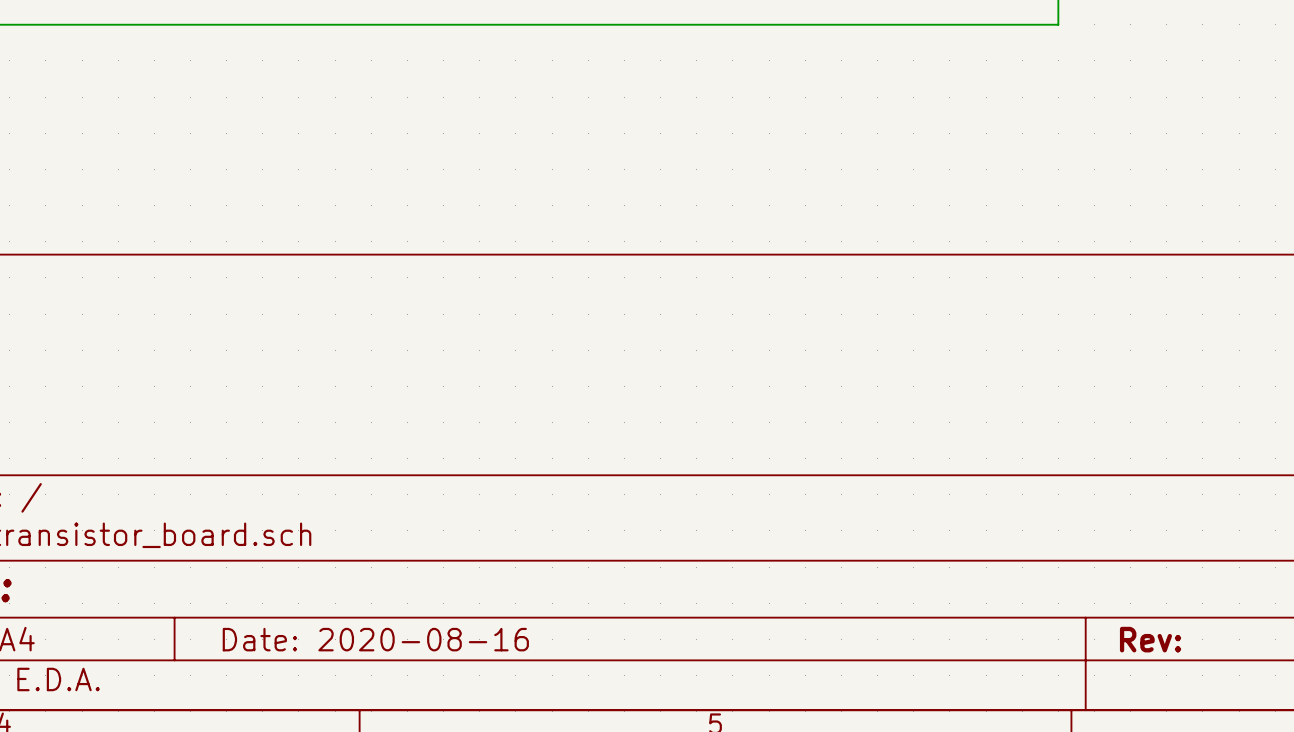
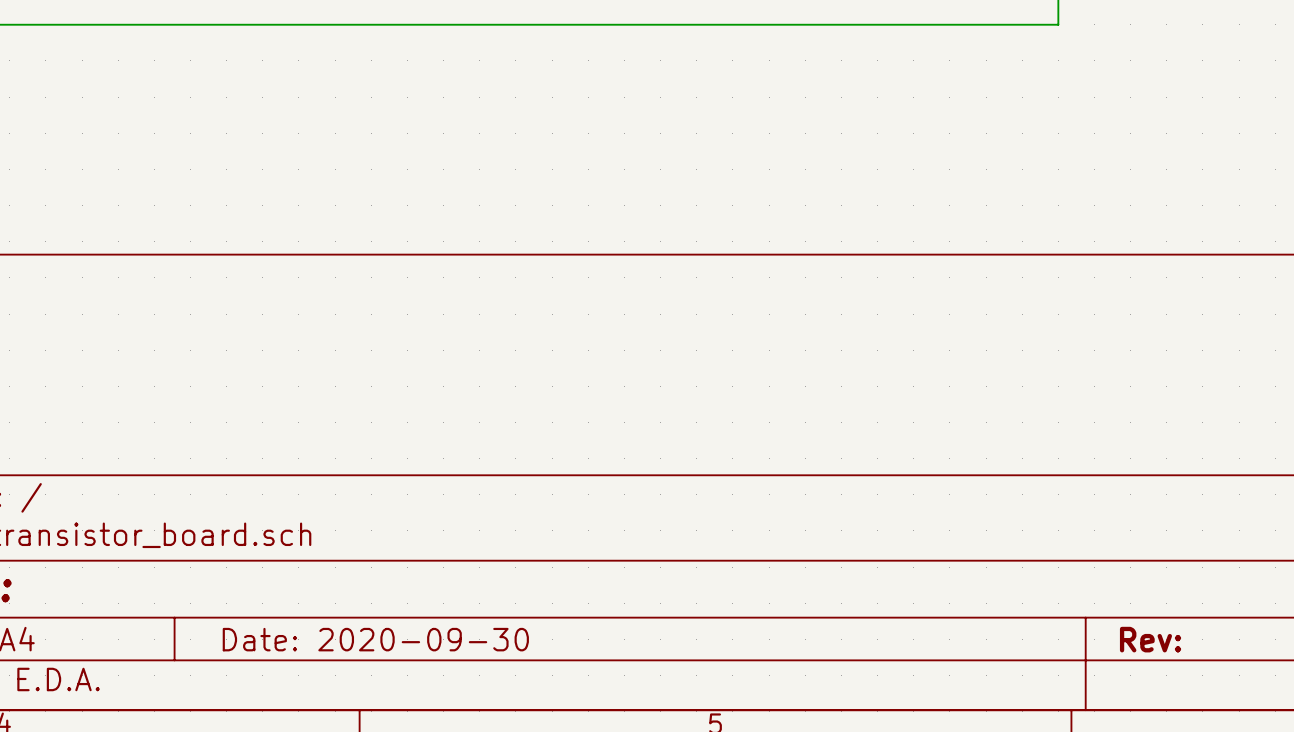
title block: Date: 2020-08-16 (375, 639) -> Date: 2020-09-30 (375, 639)

